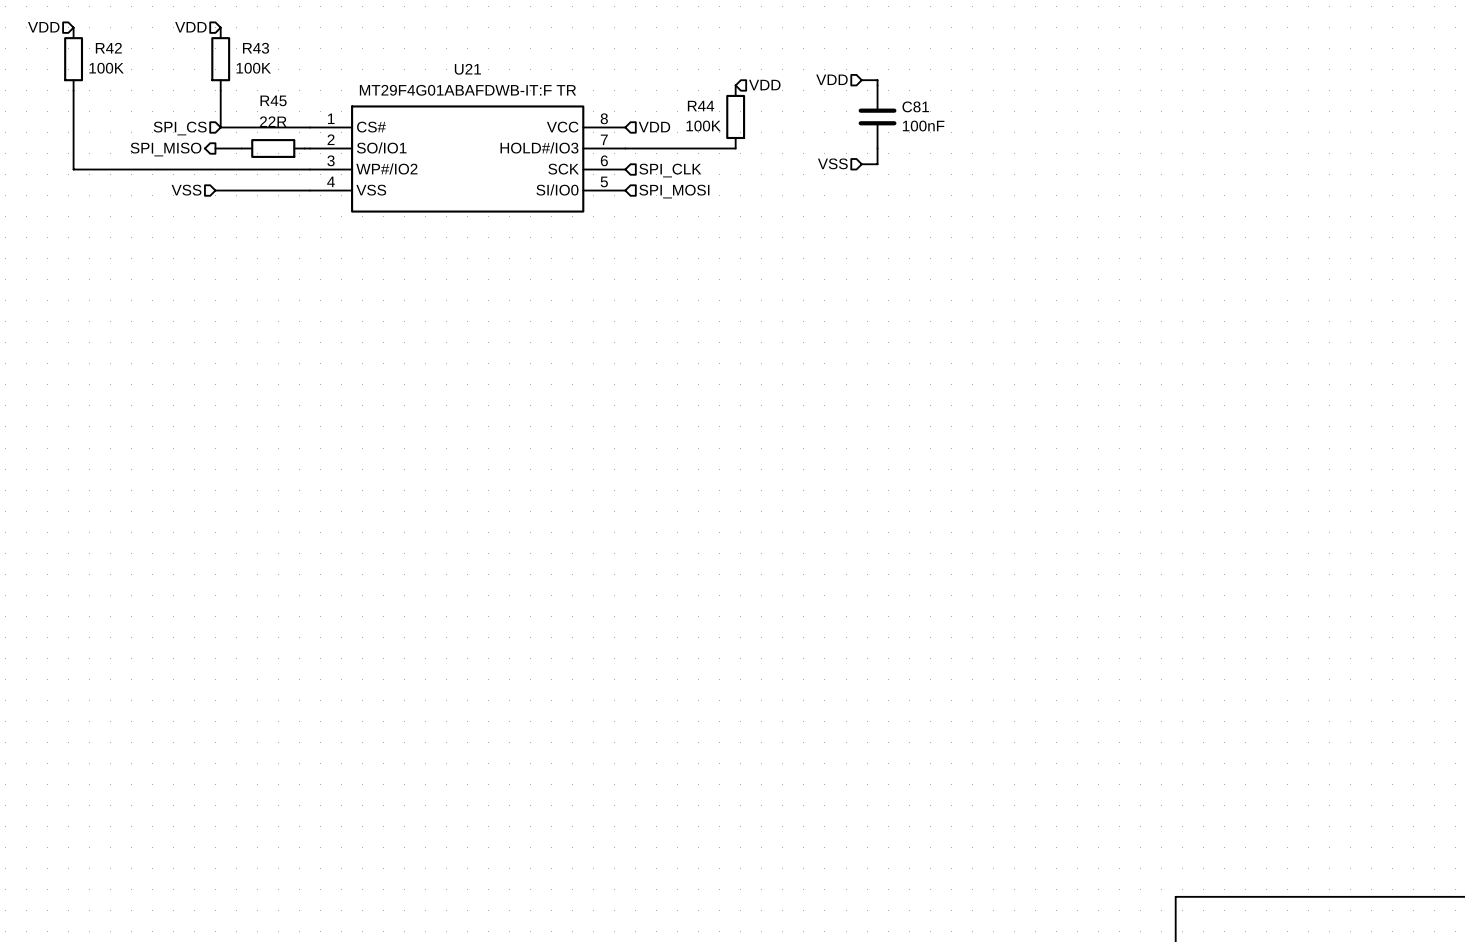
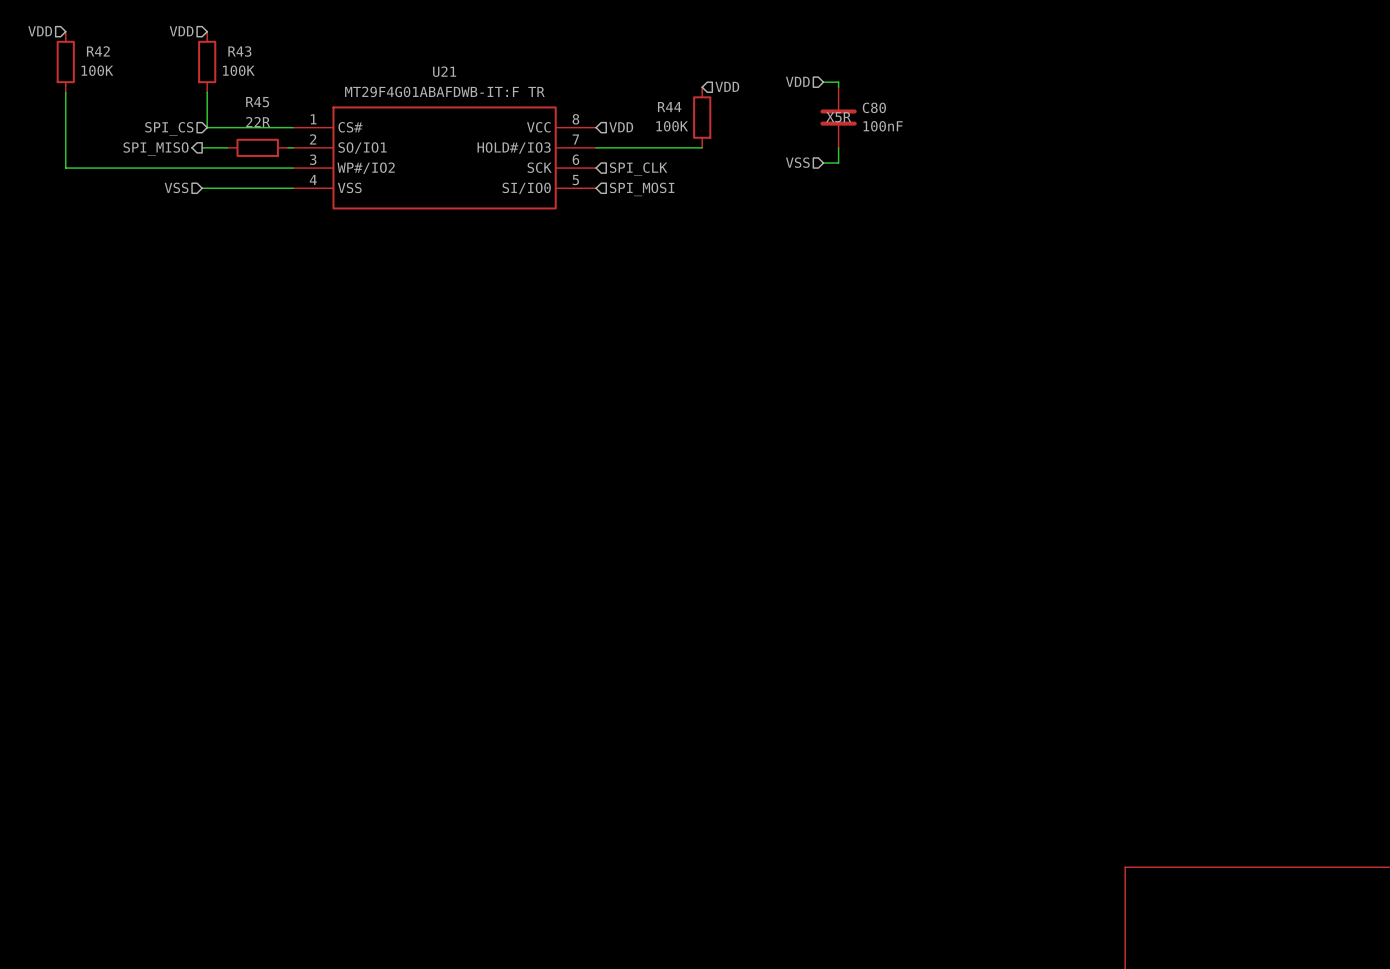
C81 name: C81 (915, 106) -> C80 (874, 107)
C81 text: none -> X5R (838, 117)

